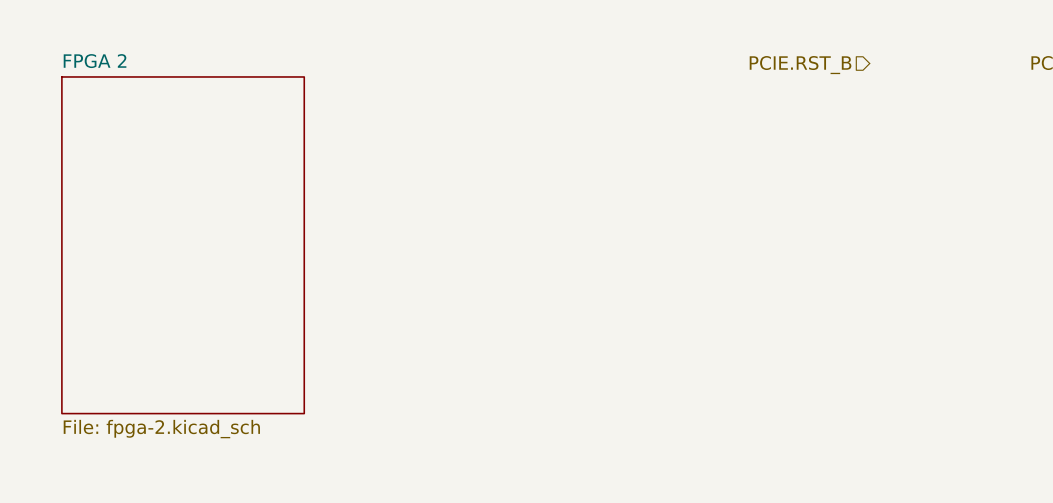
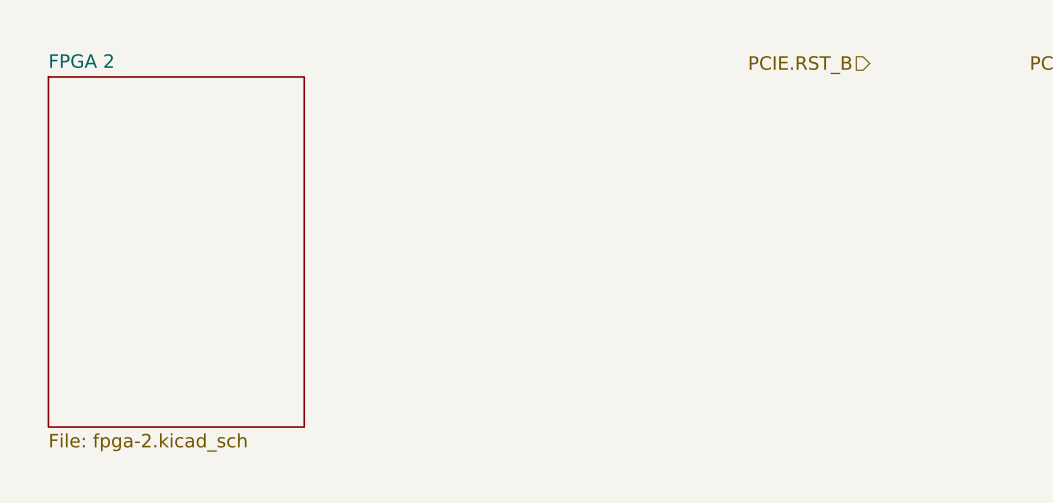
sheet FPGA 2 shape: [61, 76, 306, 415] -> [47, 76, 306, 428]

